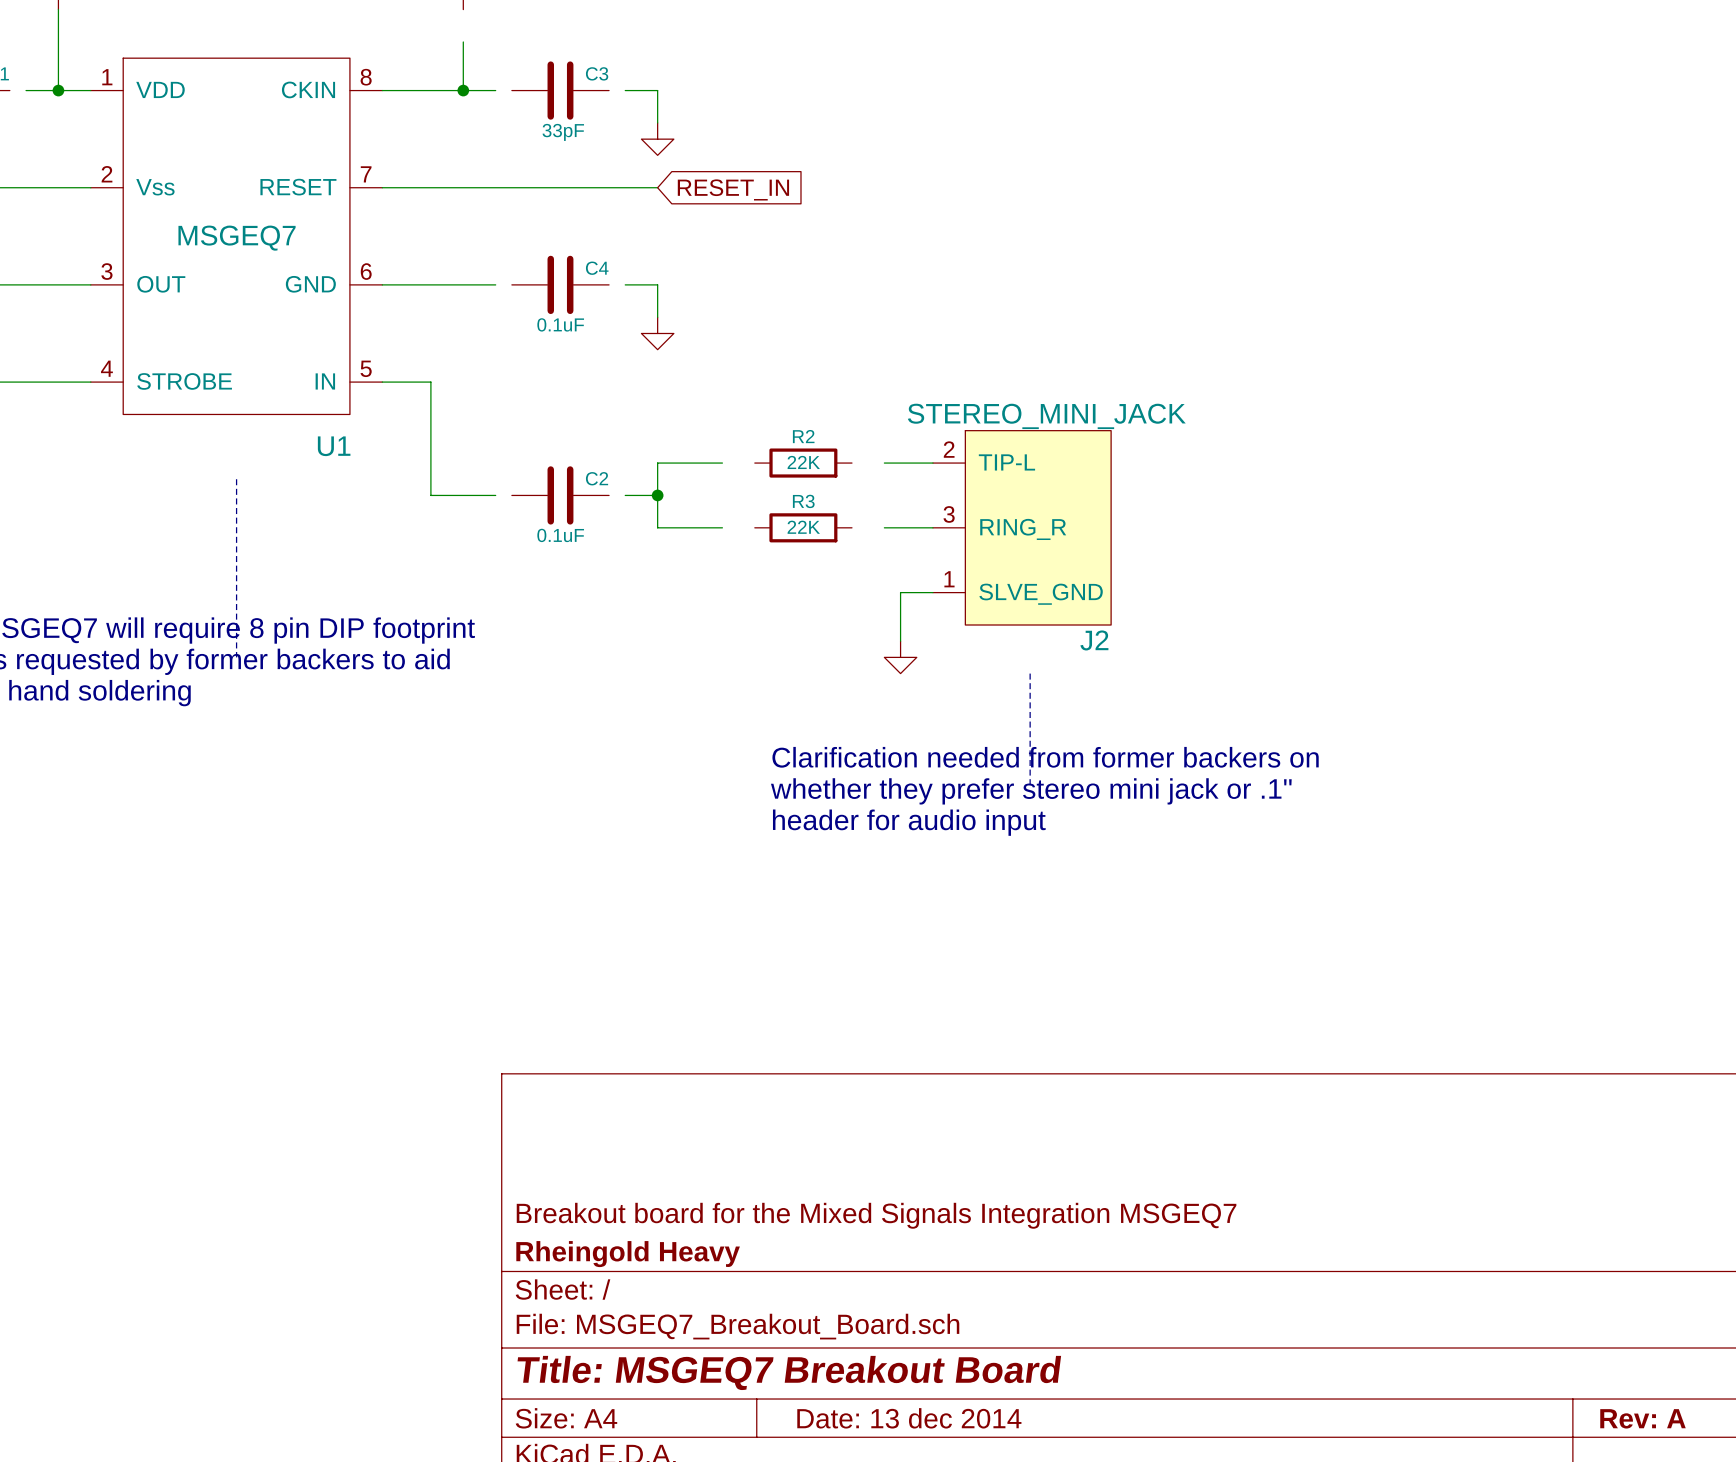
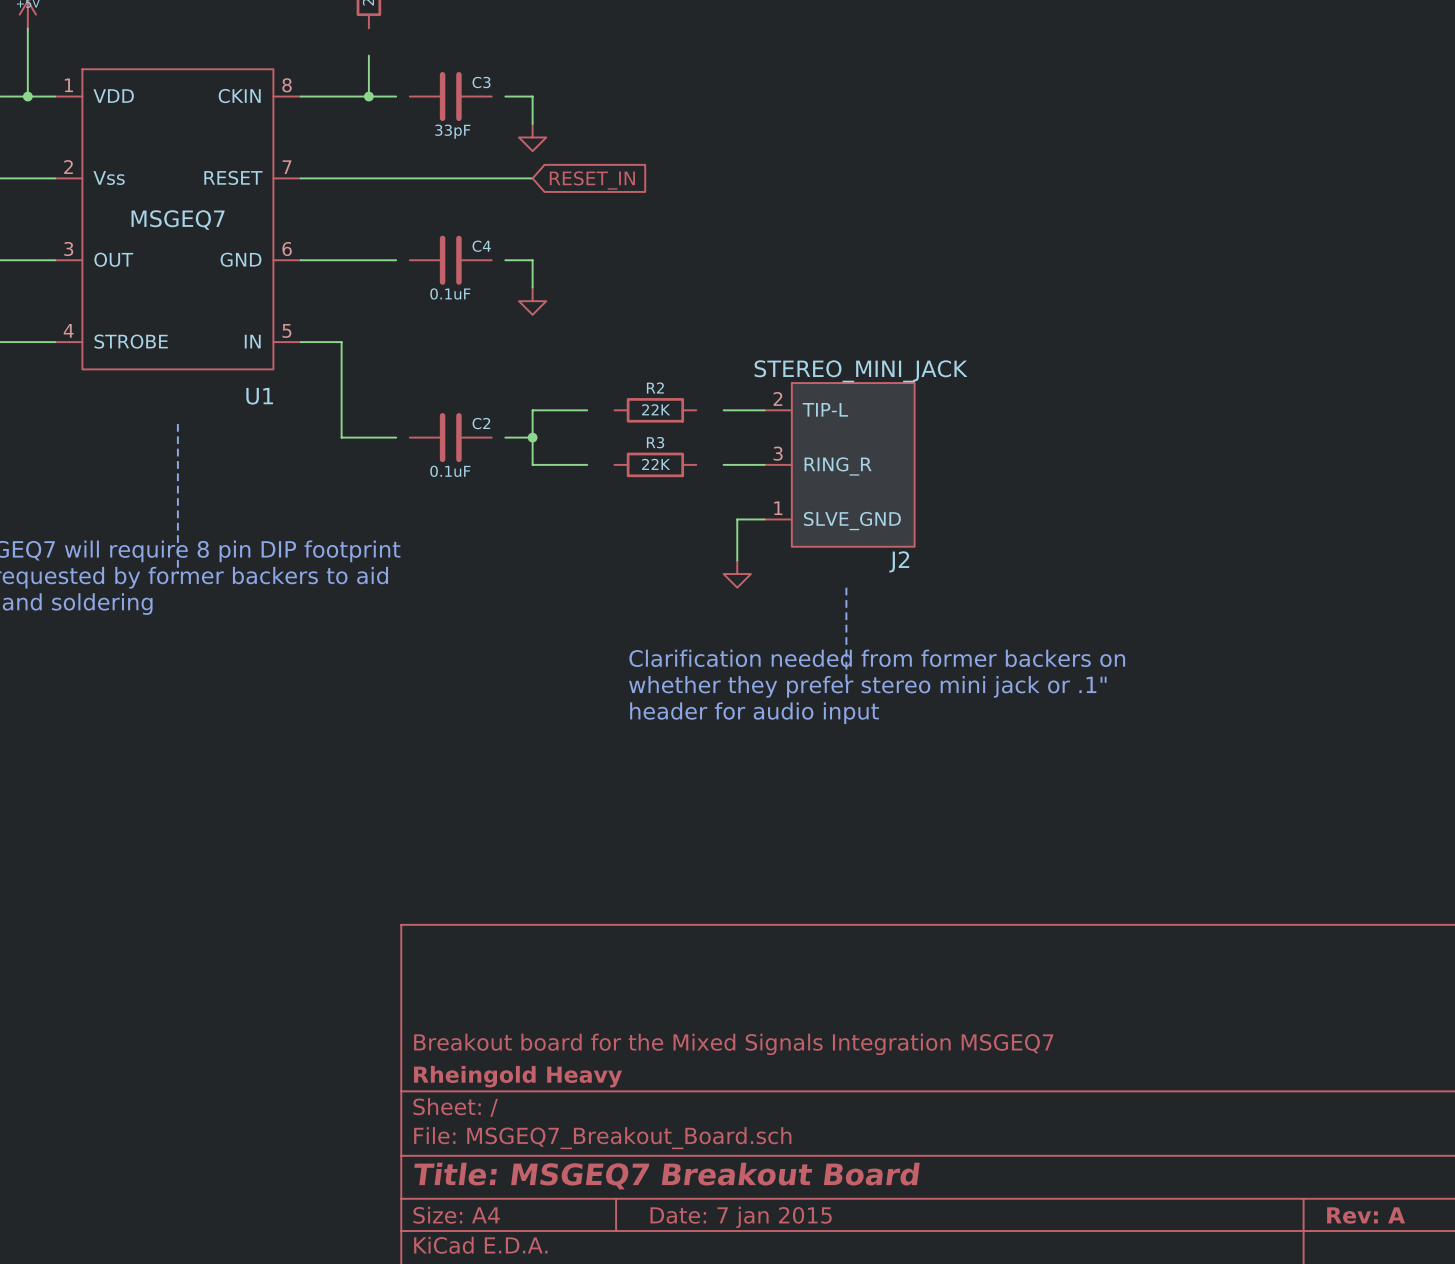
title block: Date: 13 dec 2014 (909, 1418) -> Date: 7 jan 2015 (741, 1217)

